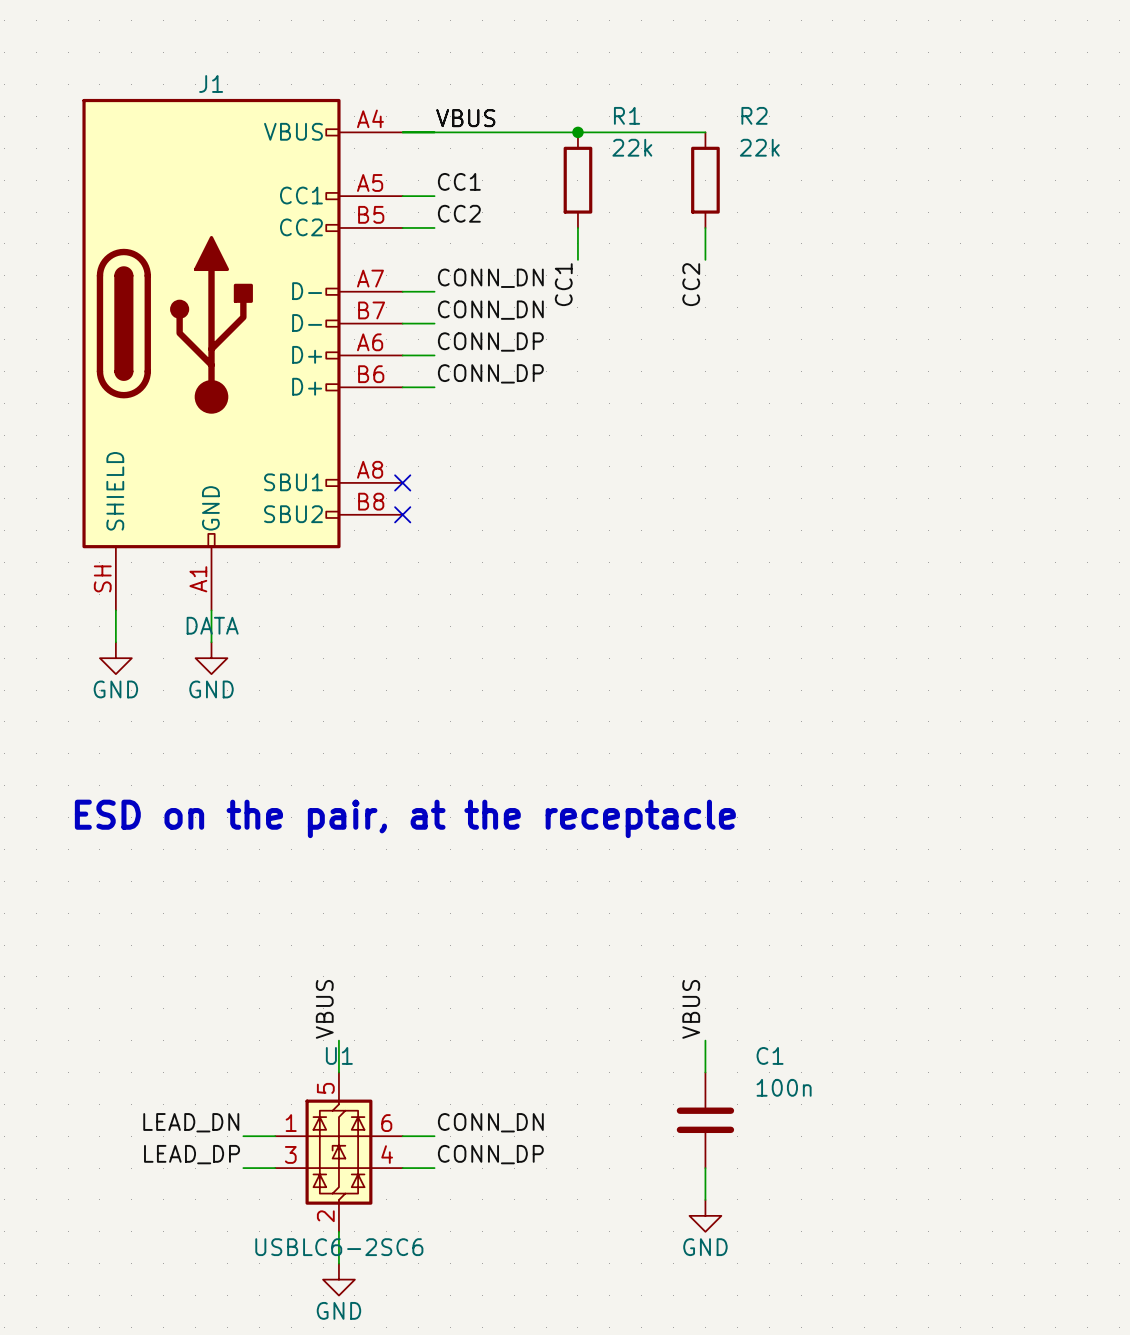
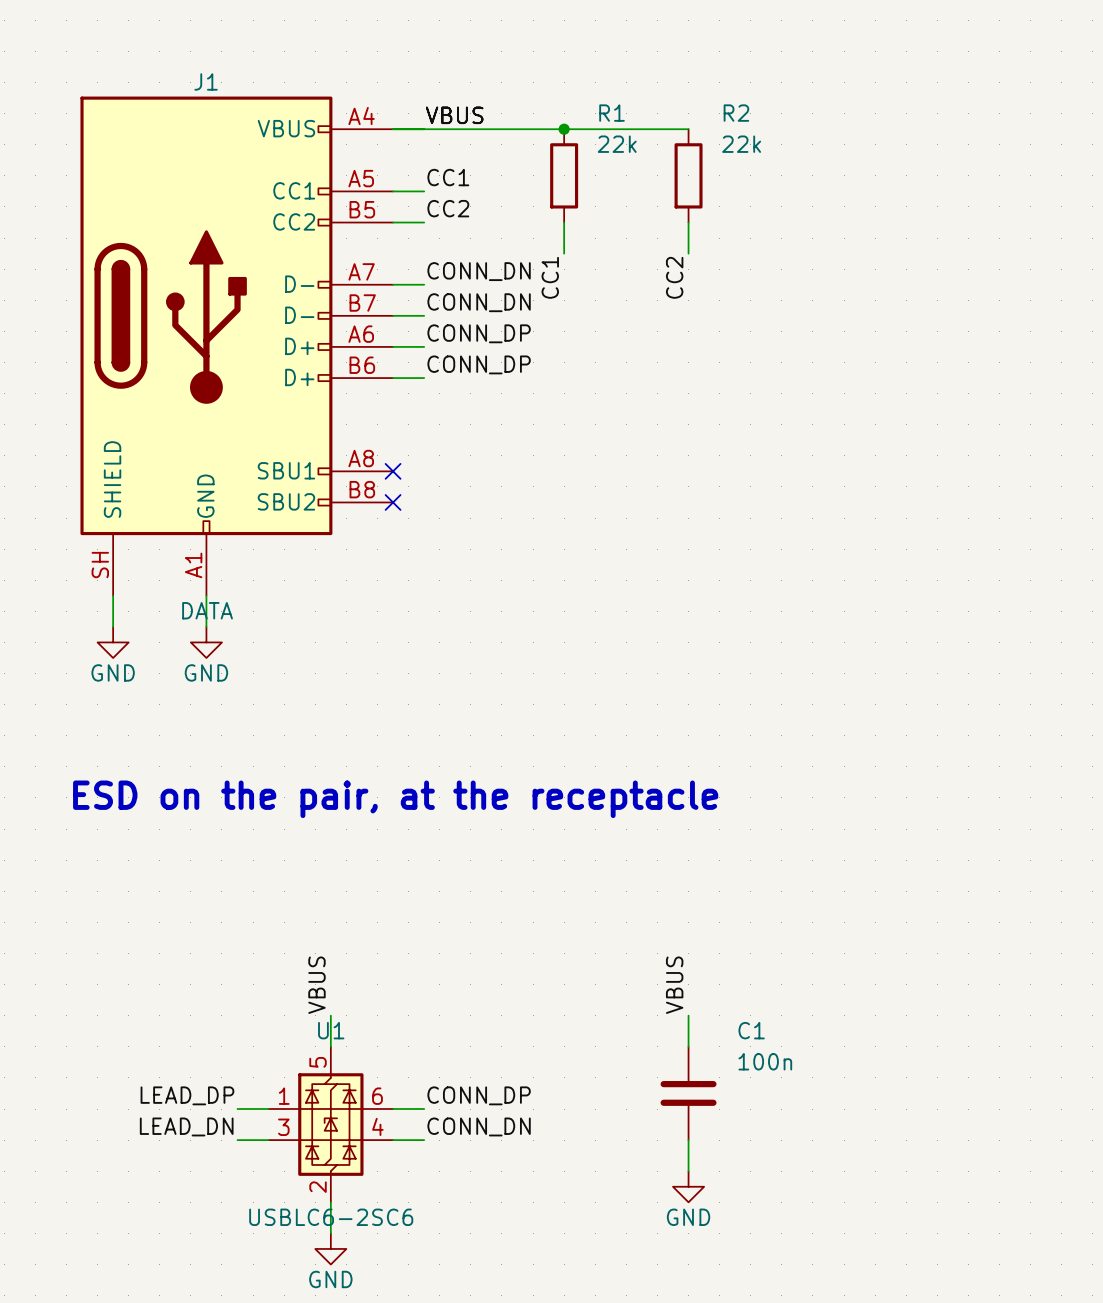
label: LEAD_DN (191, 1122) -> LEAD_DP (187, 1095)
label: CONN_DN (490, 1122) -> CONN_DP (479, 1095)
label: LEAD_DP (192, 1154) -> LEAD_DN (186, 1126)
label: CONN_DP (490, 1154) -> CONN_DN (479, 1126)

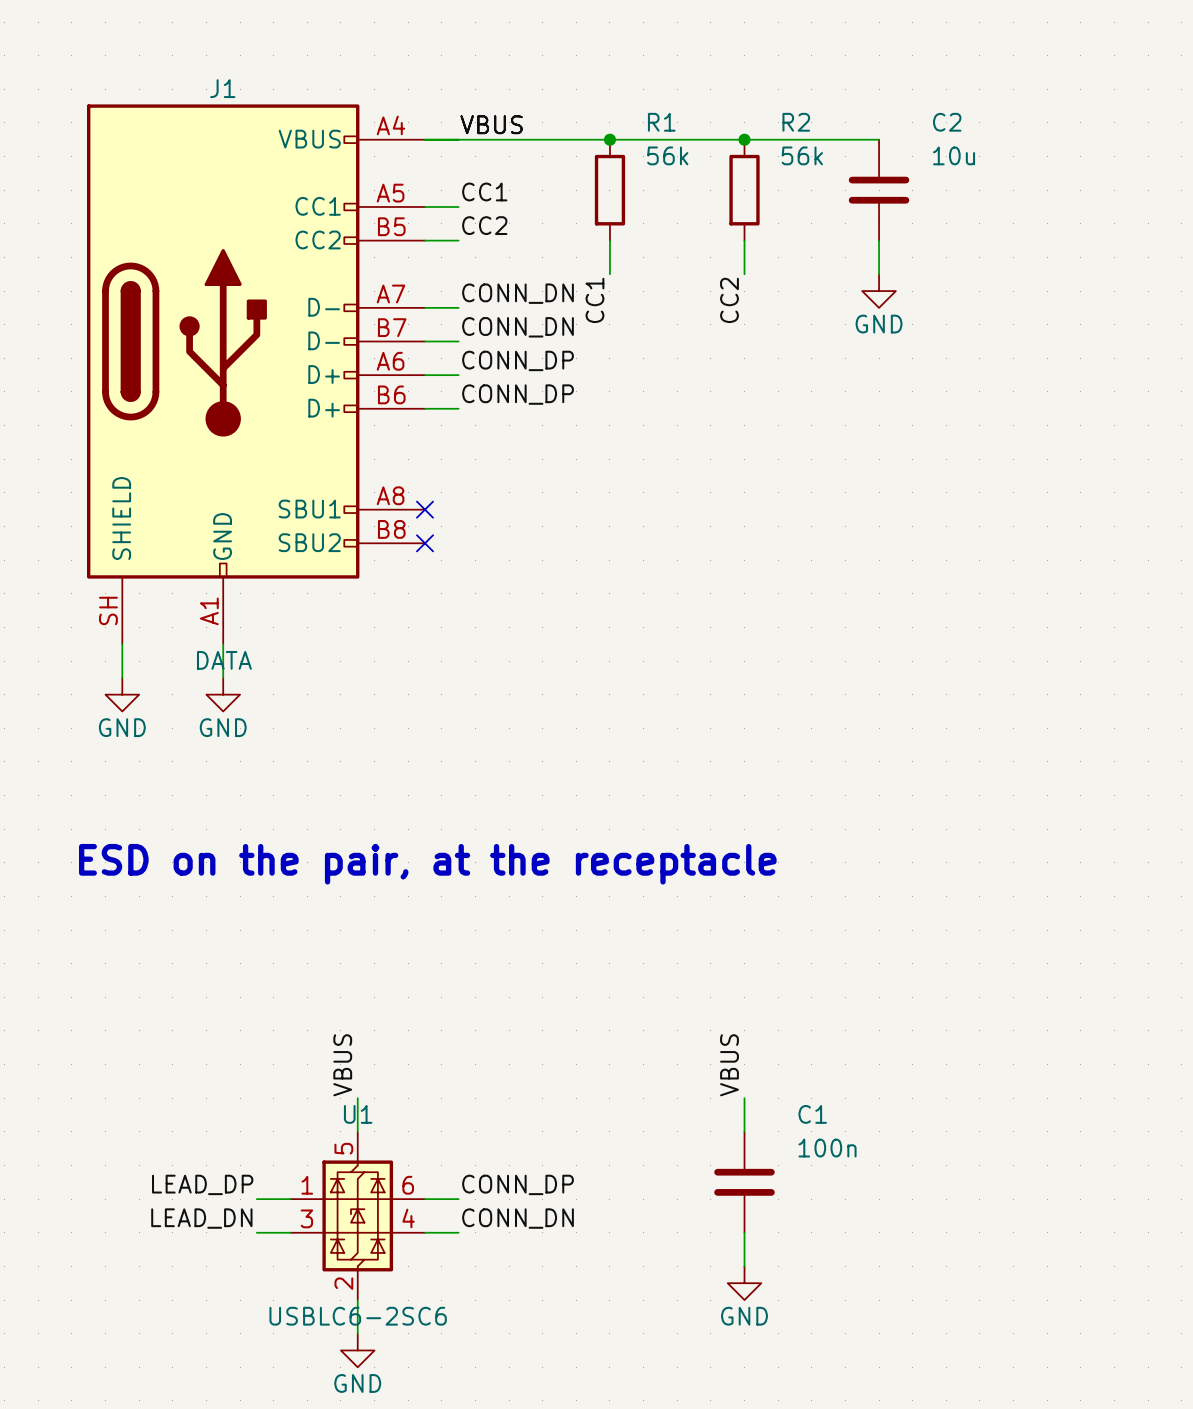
wire: none -> (744, 139) (879, 139)
junction: none -> (744, 139)
R1 value: 22k (617, 144) -> 56k (667, 155)
R2 value: 22k (741, 144) -> 56k (802, 155)
C2: none -> 10u (879, 190)
wire: none -> (879, 240) (879, 274)
power symbol: none -> GND (879, 291)

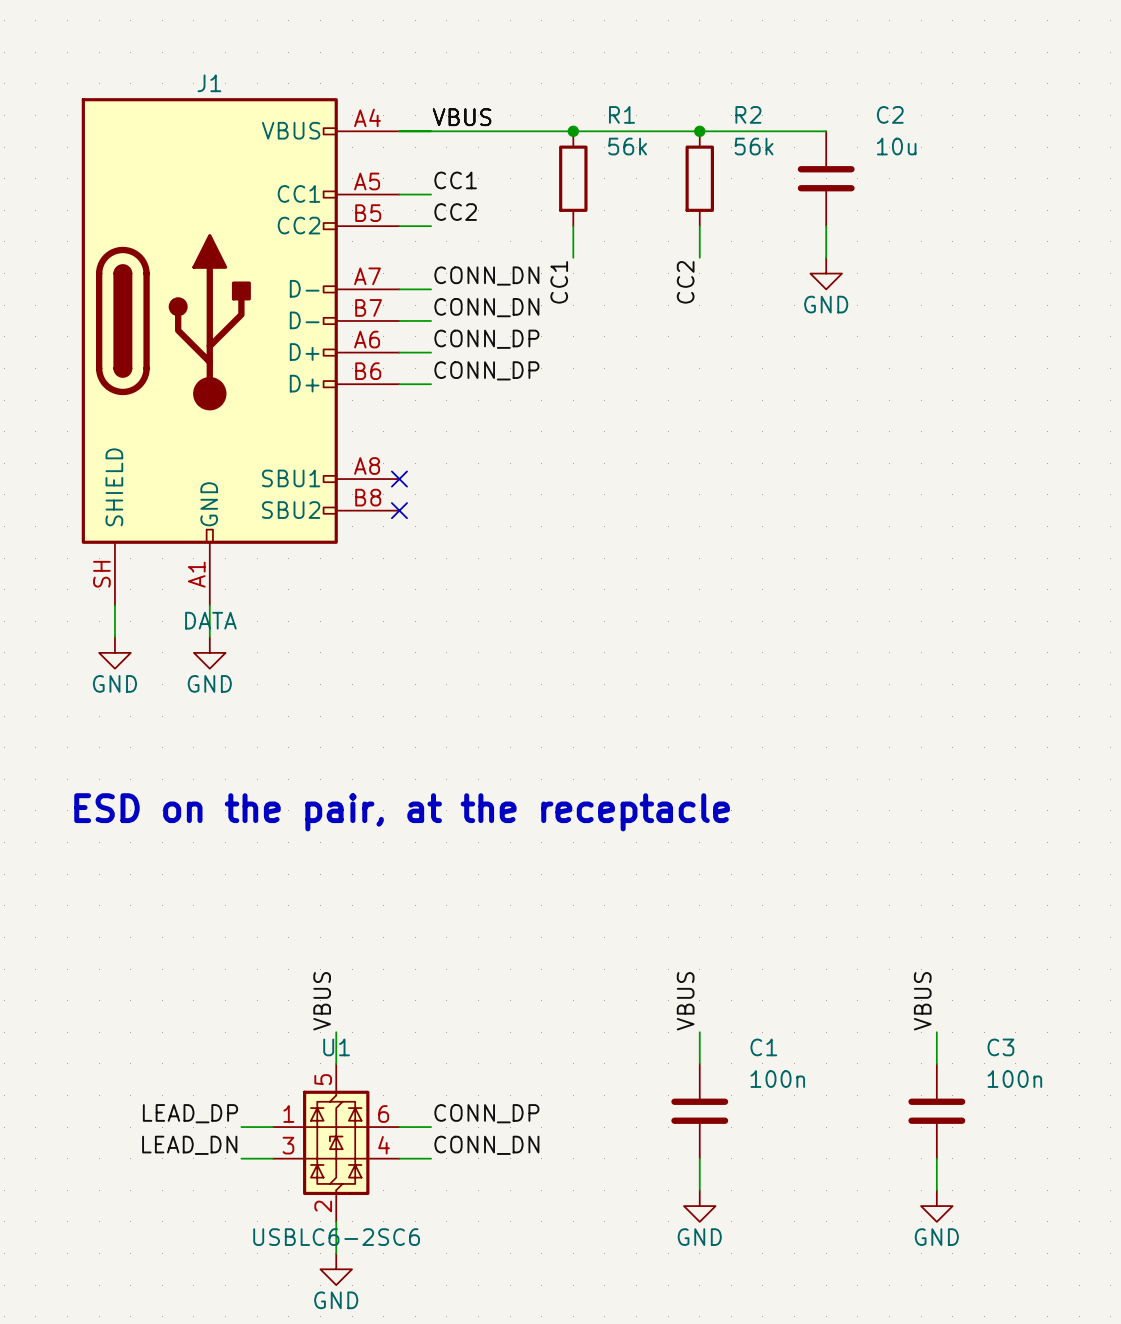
label: none -> VBUS (922, 1001)
wire: none -> (936, 1032) (936, 1063)
C3: none -> 100n (936, 1111)
wire: none -> (936, 1158) (936, 1190)
power symbol: none -> GND (936, 1206)

